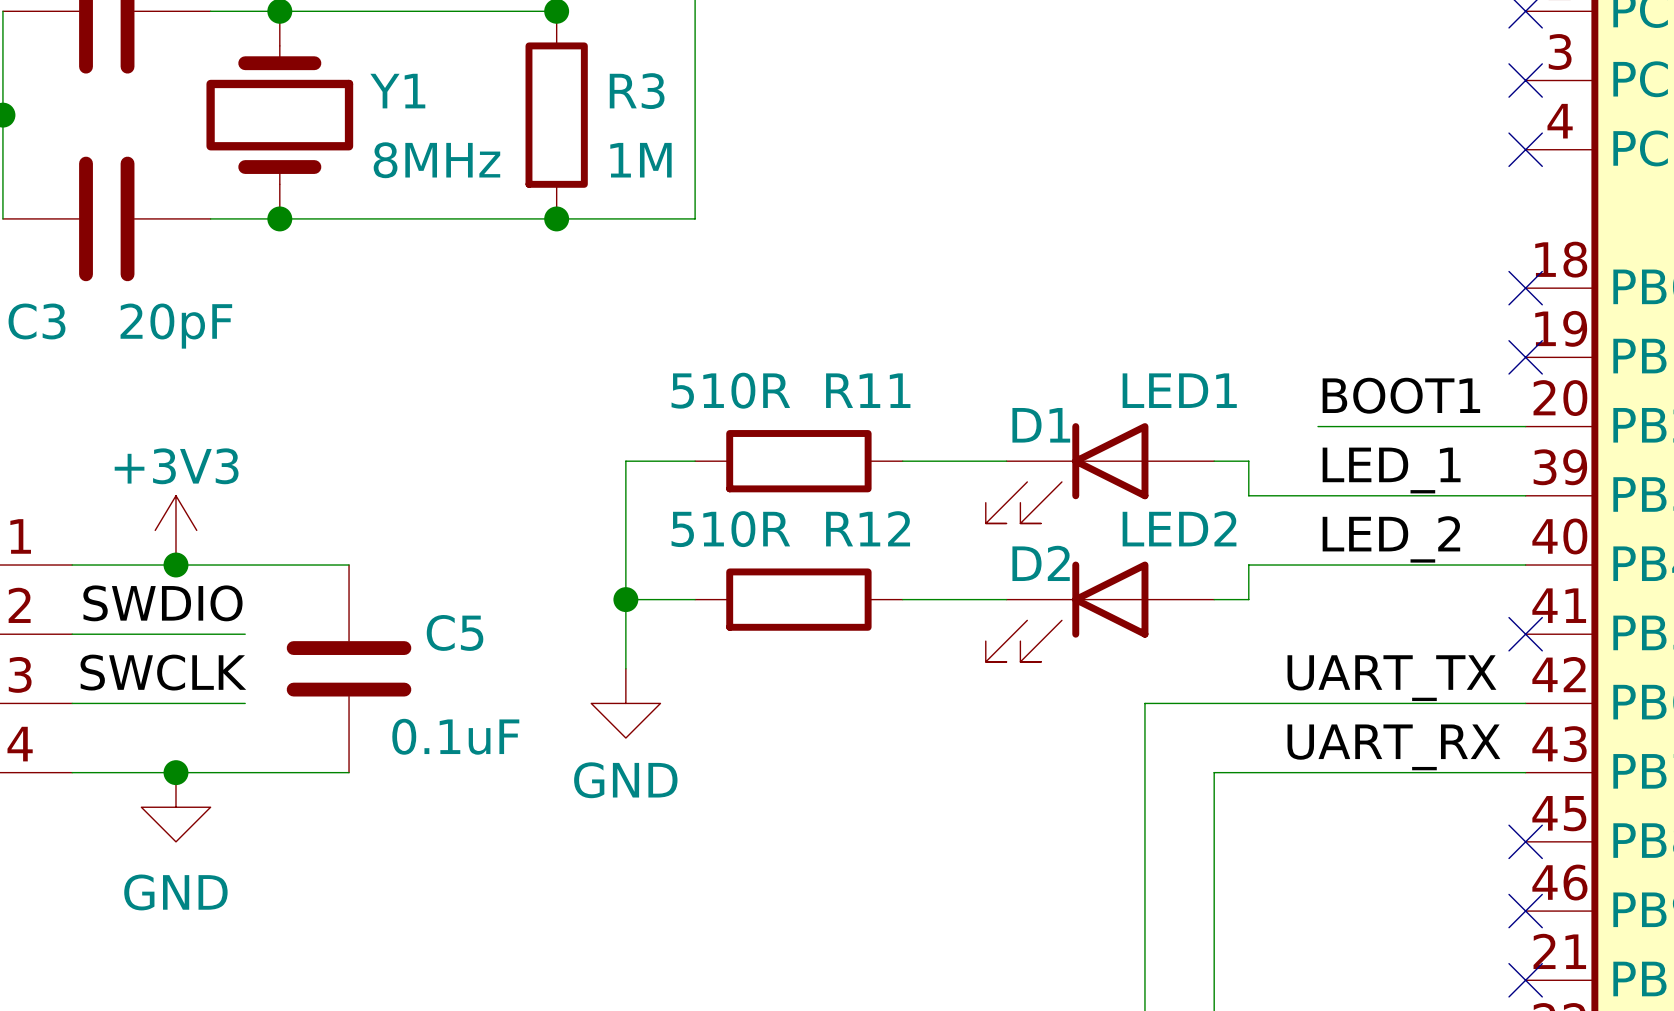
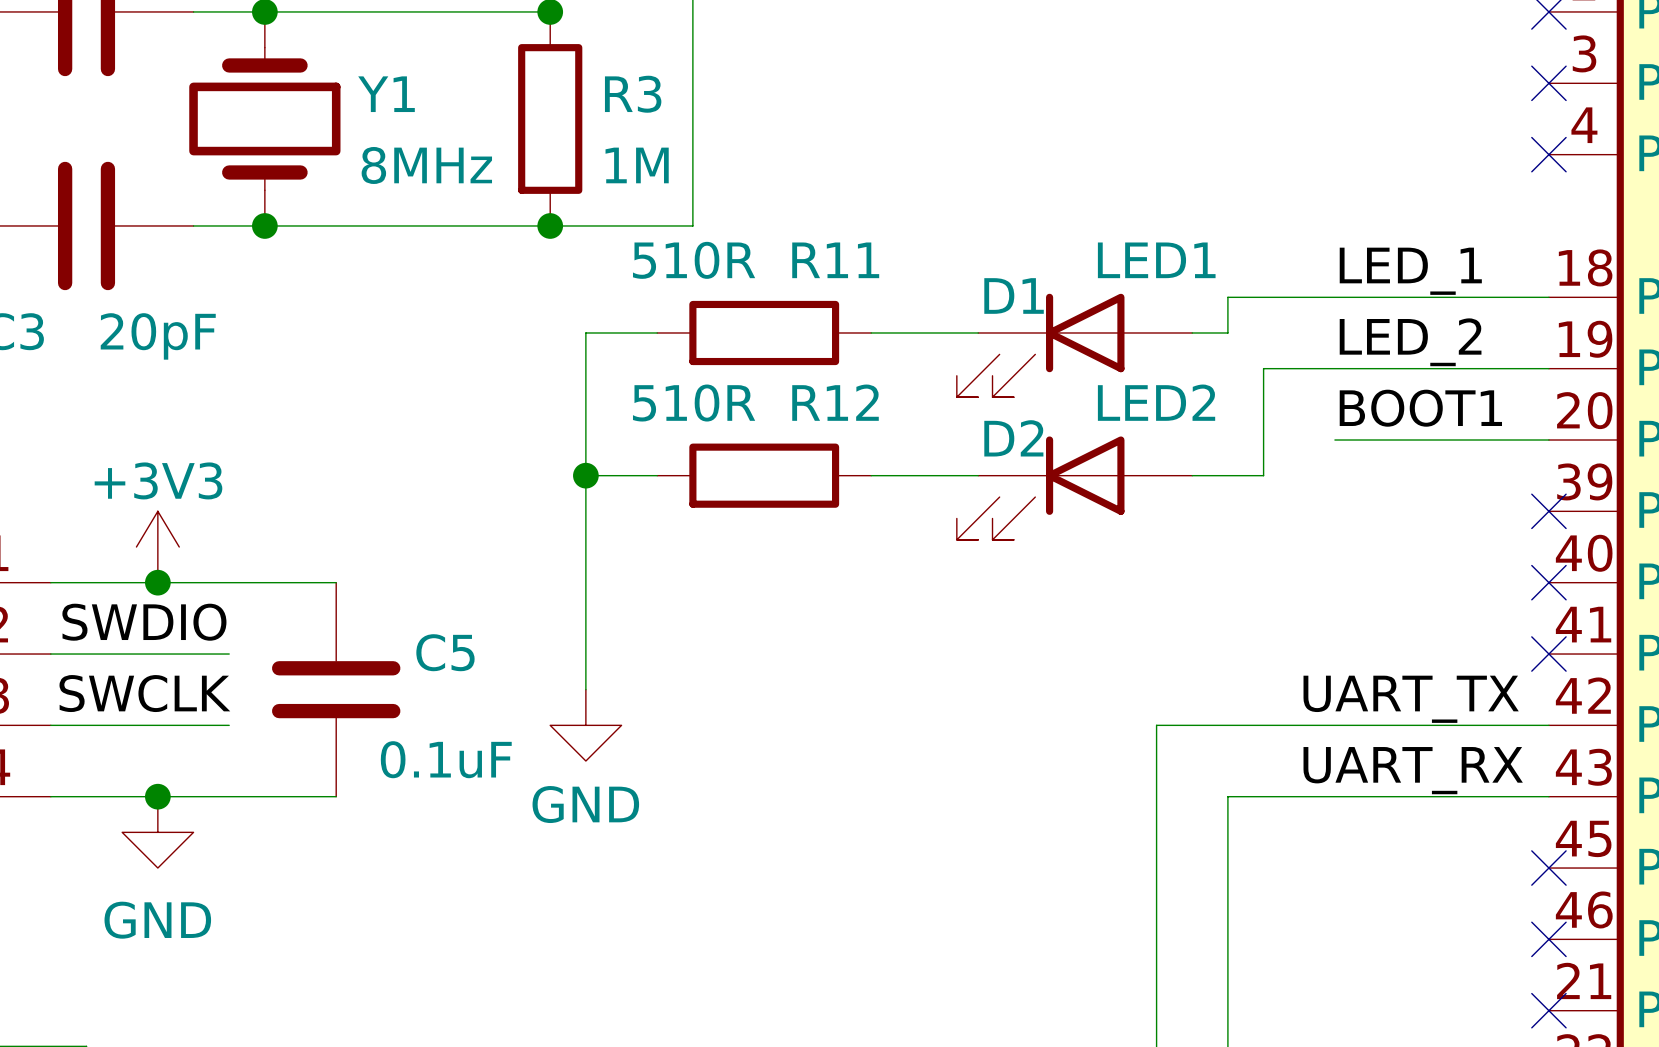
wire: none -> (1548, 297) (1227, 297) (1227, 332) (1192, 332)
no-connect mark: (1525, 288) -> none
wire: none -> (657, 332) (585, 332) (585, 689)
no-connect mark: (1525, 357) -> none
wire: (625, 461) (625, 668) -> (621, 475) (585, 475)
R11 position: (798, 461) -> (764, 332)
wire: (1248, 461) (1248, 495) (1525, 495) -> (1263, 475) (1263, 368) (1548, 368)
label position: LED_1 (1391, 470) -> LED_1 (1410, 271)
D1 position: (1099, 473) -> (1074, 345)
no-connect mark: none -> (1548, 511)
label position: LED_2 (1391, 539) -> LED_2 (1410, 342)
wire: (1525, 565) (1248, 565) (1248, 599) (1214, 599) -> none
no-connect mark: none -> (1548, 582)
wire: (625, 599) (695, 599) -> none
junction position: (625, 599) -> (585, 475)
R12 position: (798, 599) -> (764, 475)
wire: (902, 599) (1006, 599) -> (871, 332) (978, 332)
D2 position: (1099, 611) -> (1074, 488)
power symbol position: GND (625, 703) -> GND (585, 725)

